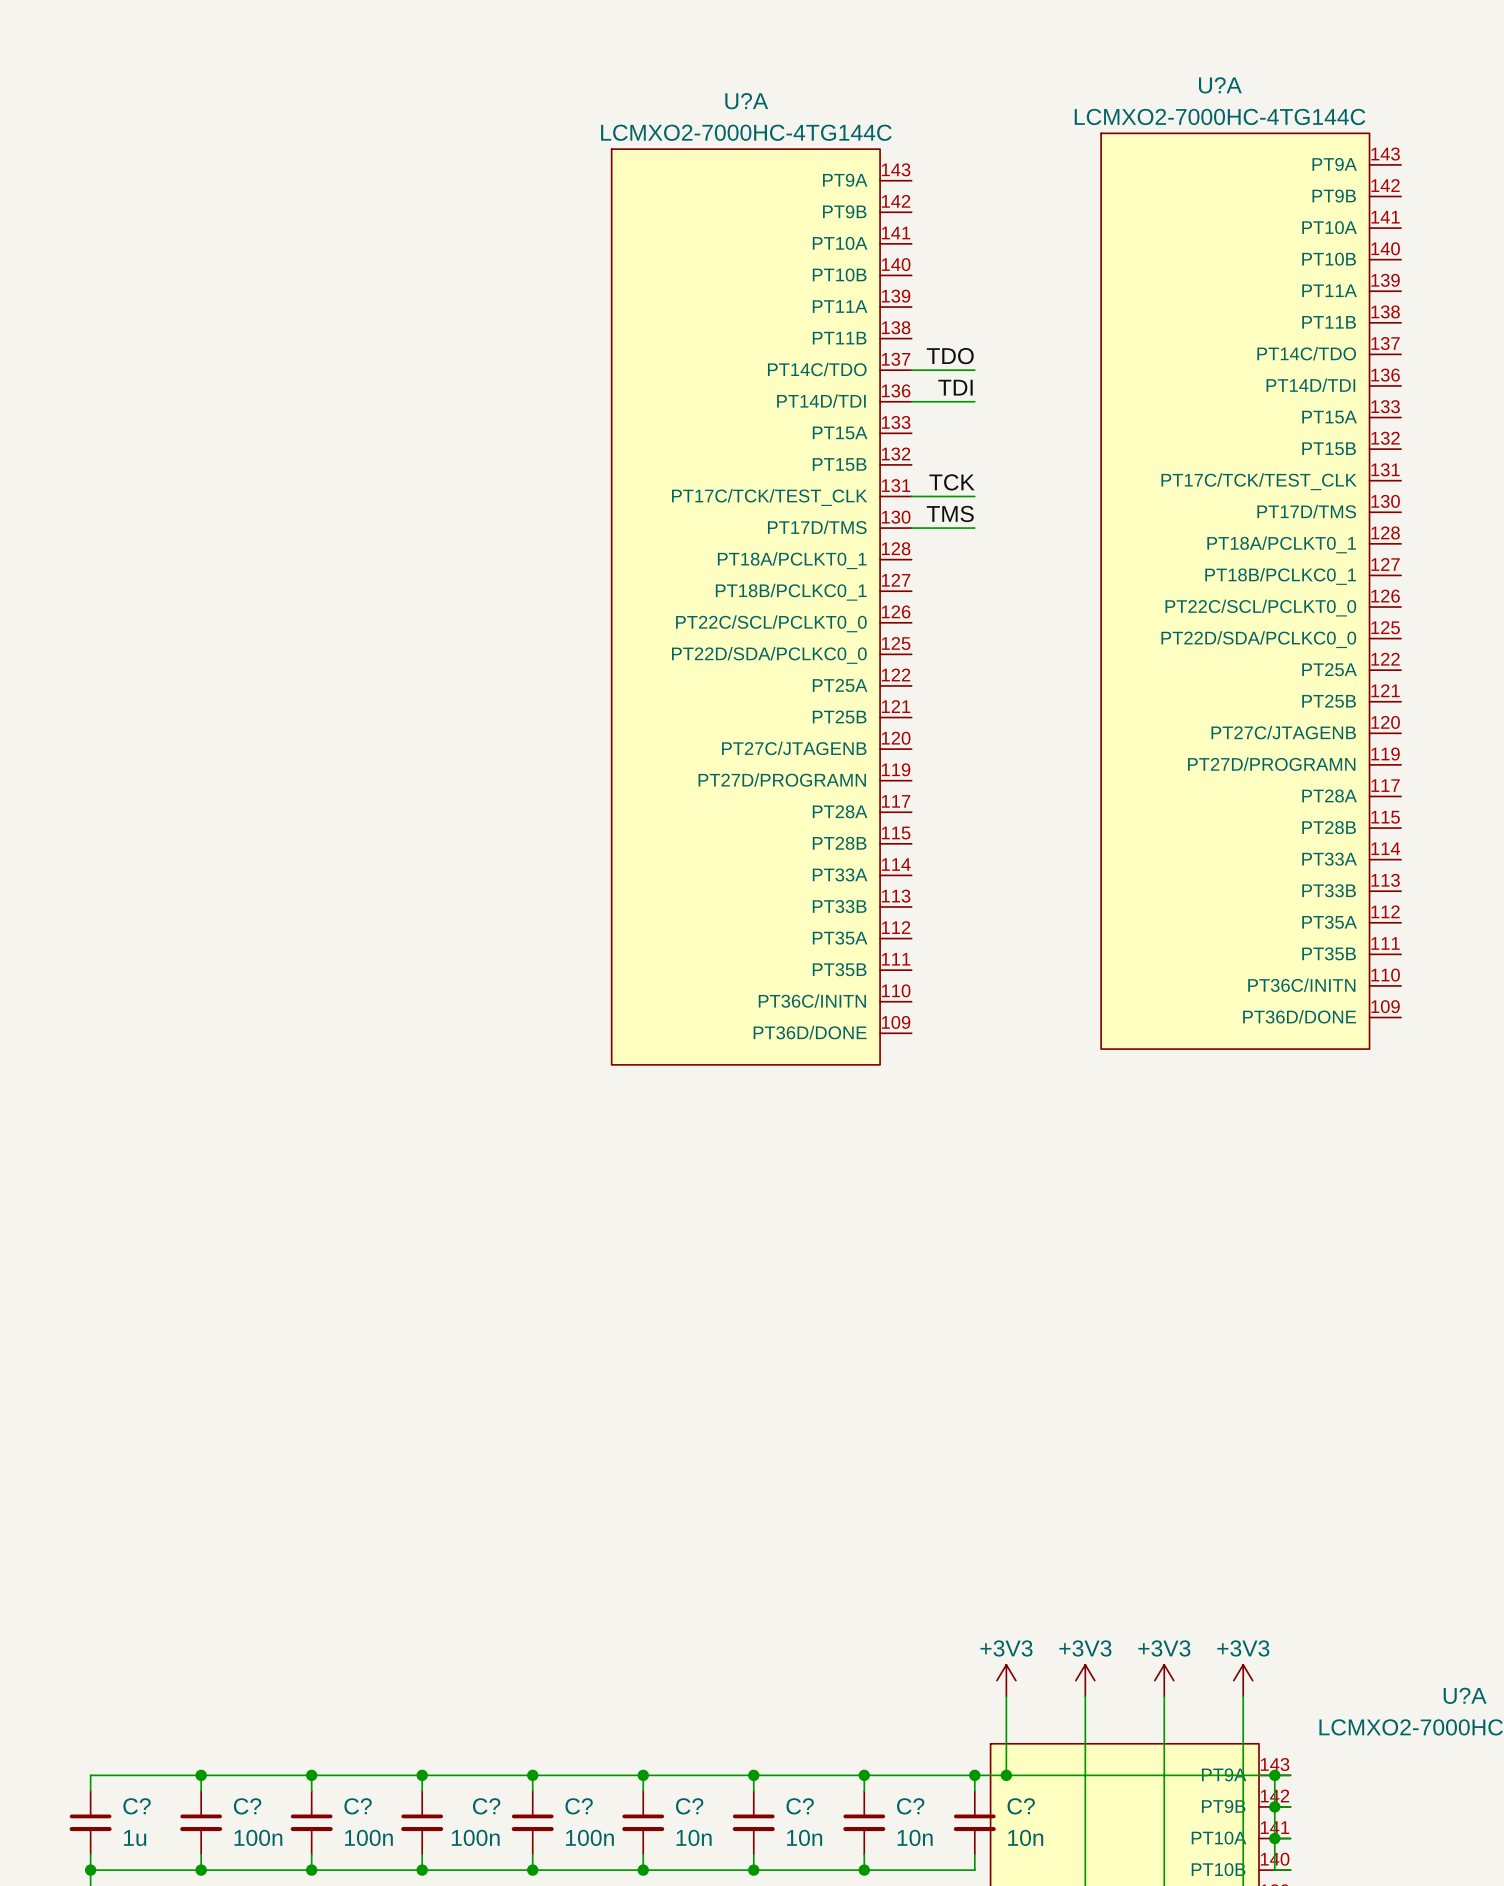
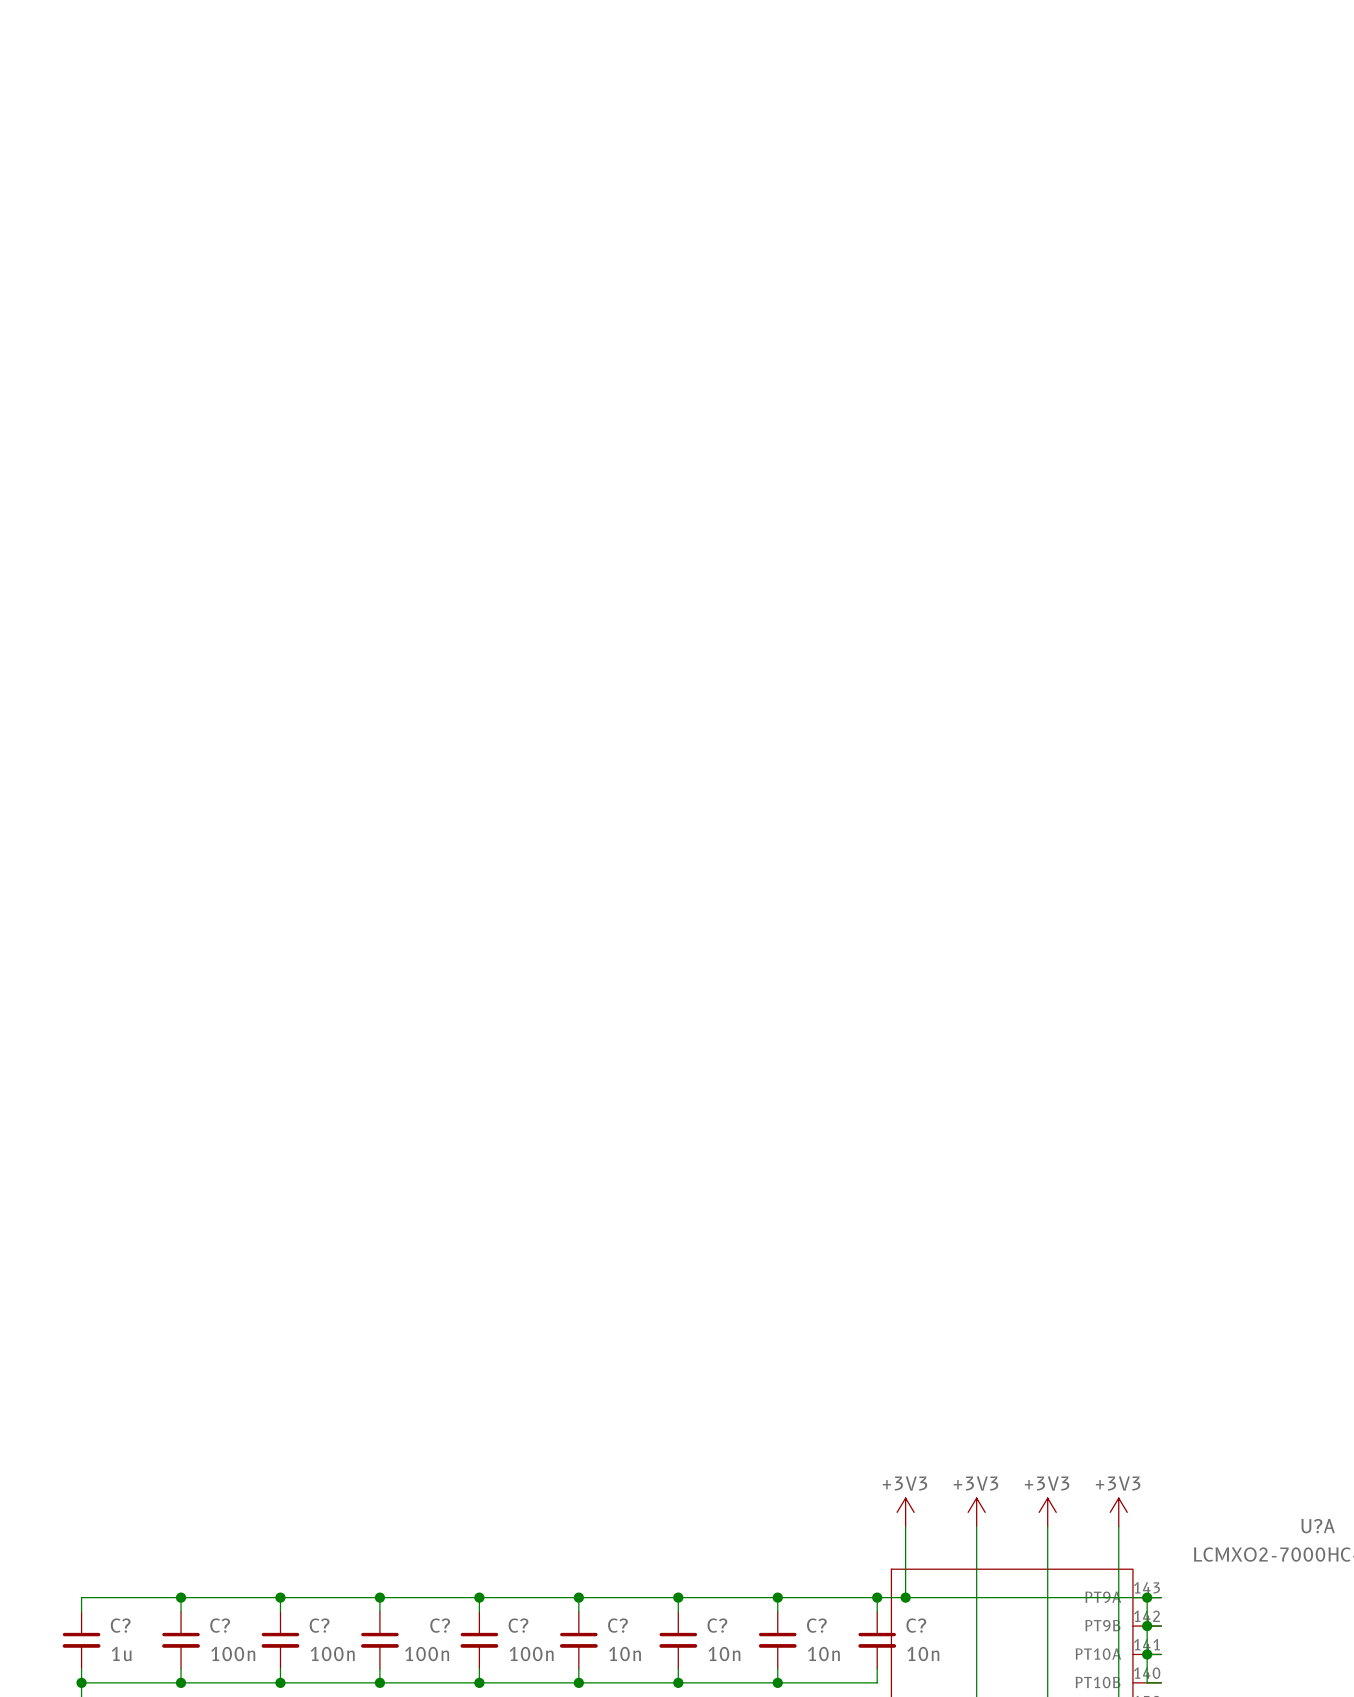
label: TDO (950, 356) -> none
wire: (911, 370) (974, 370) -> none
label: TDI (955, 387) -> none
wire: (911, 401) (974, 401) -> none
label: TCK (951, 482) -> none
wire: (911, 496) (974, 496) -> none
label: TMS (950, 513) -> none
wire: (911, 528) (974, 528) -> none
U?A: LCMXO2-7000HC-4TG144C (1251, 591) -> none
U?A: LCMXO2-7000HC-4TG144C (761, 607) -> none

